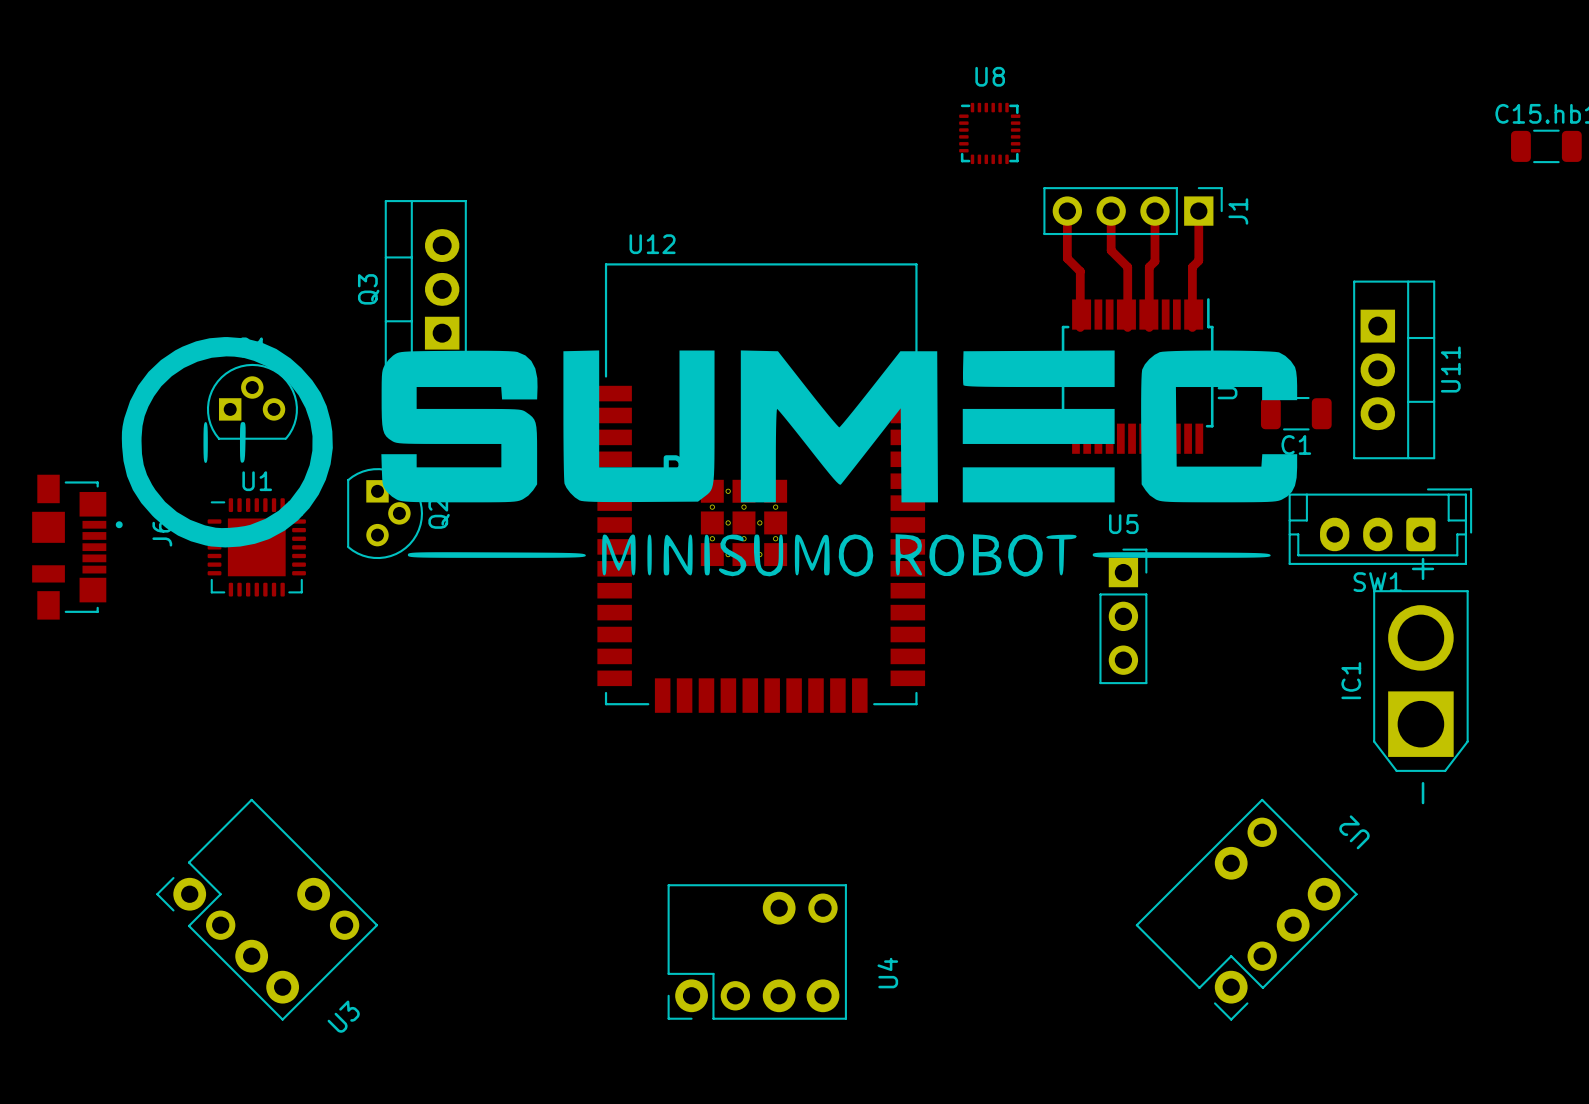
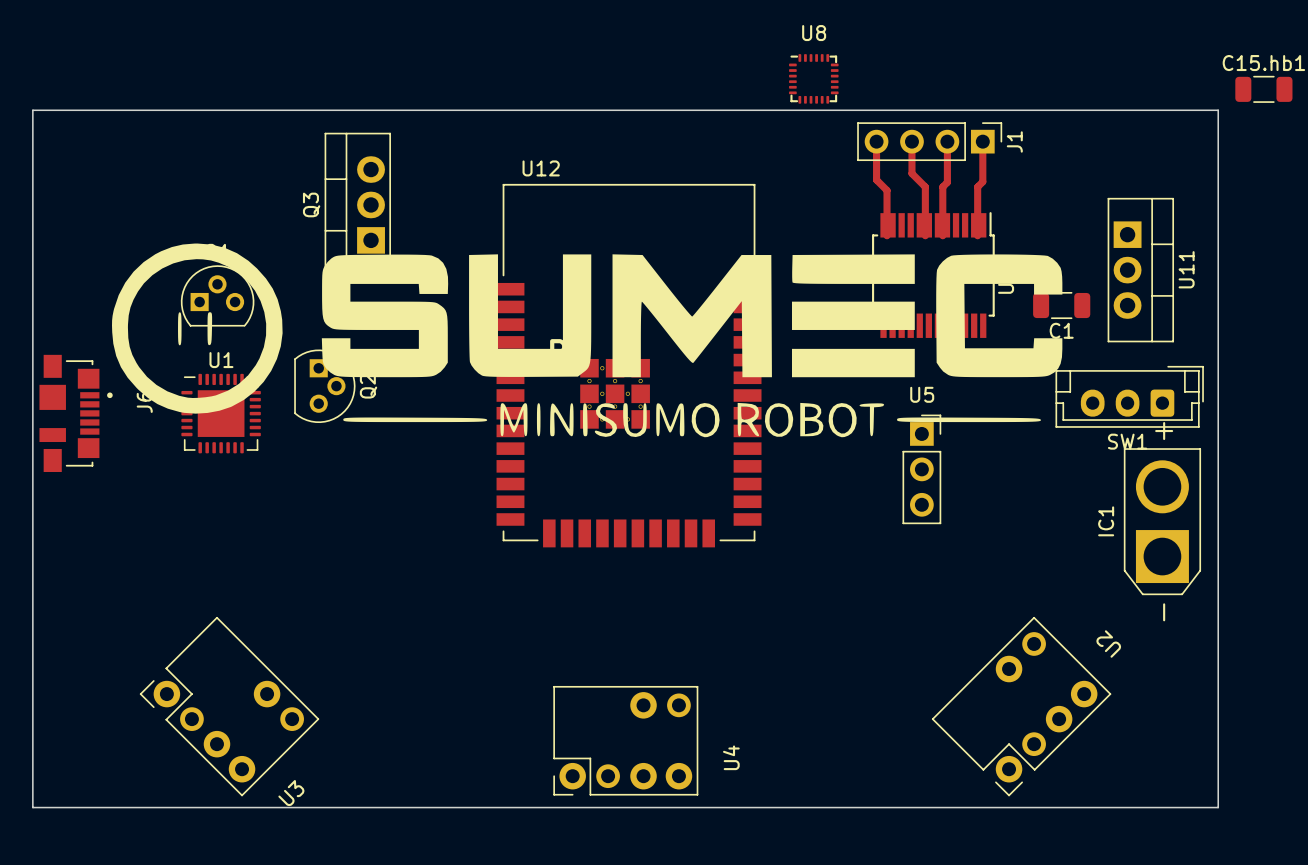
board edge: none -> (32, 110) (1218, 110) (1218, 807) (32, 807) (32, 110)

